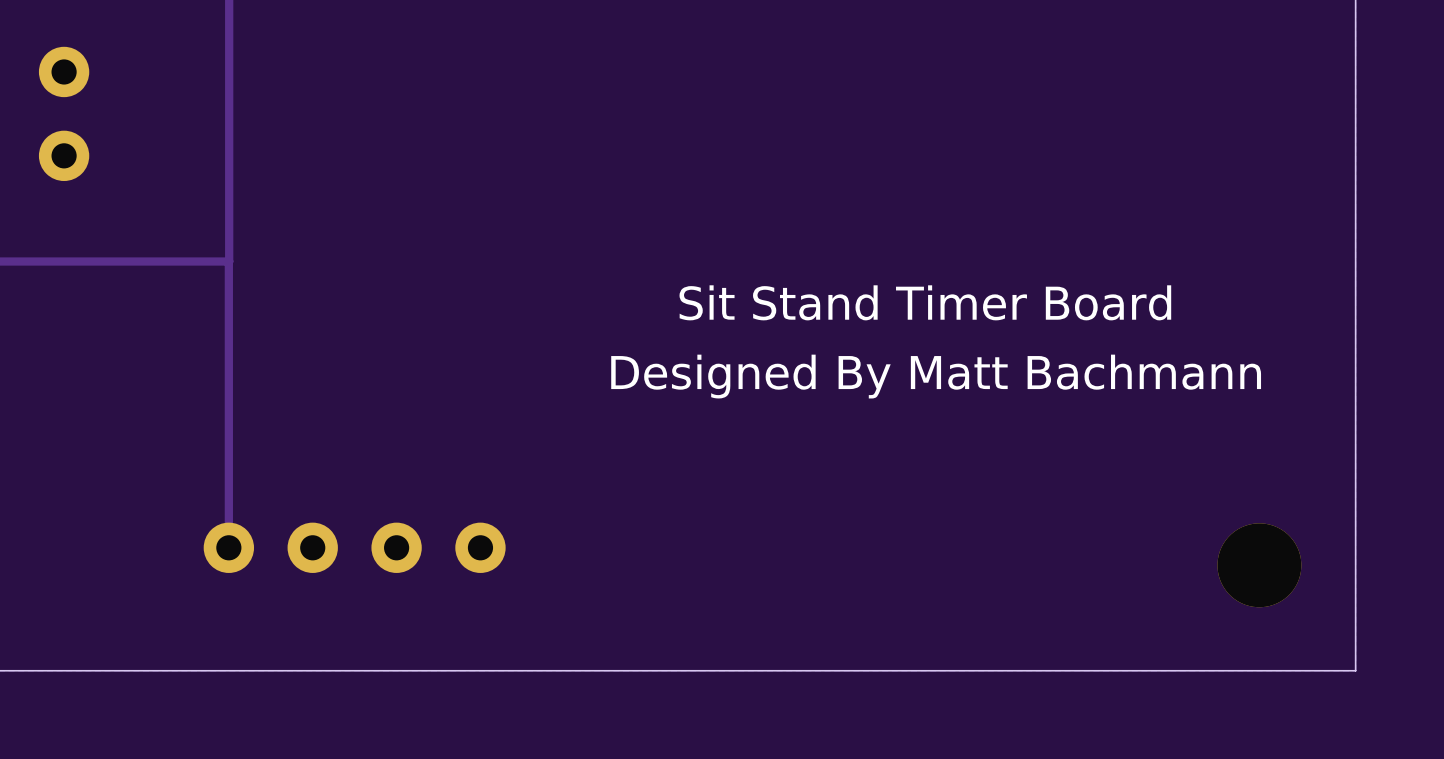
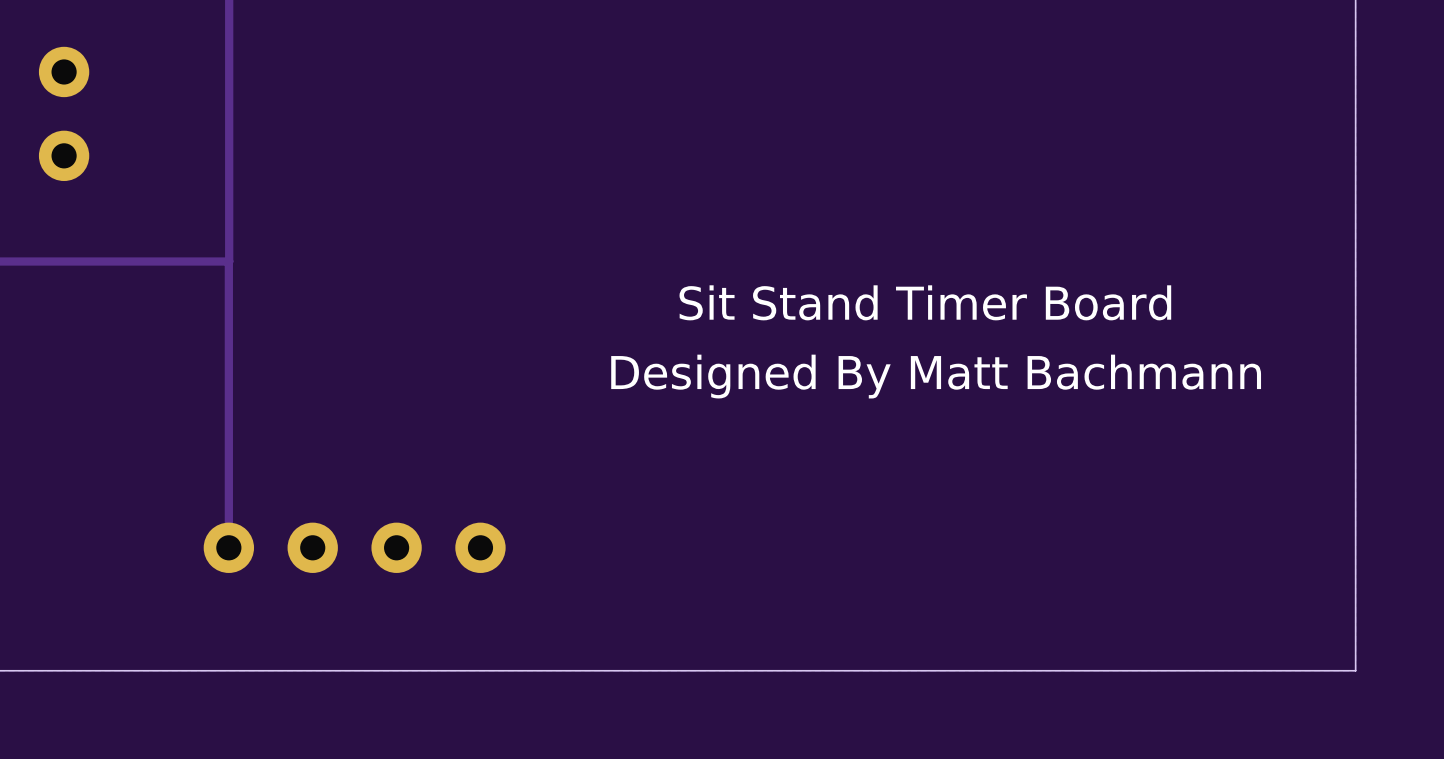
part: (1259, 565) -> none

